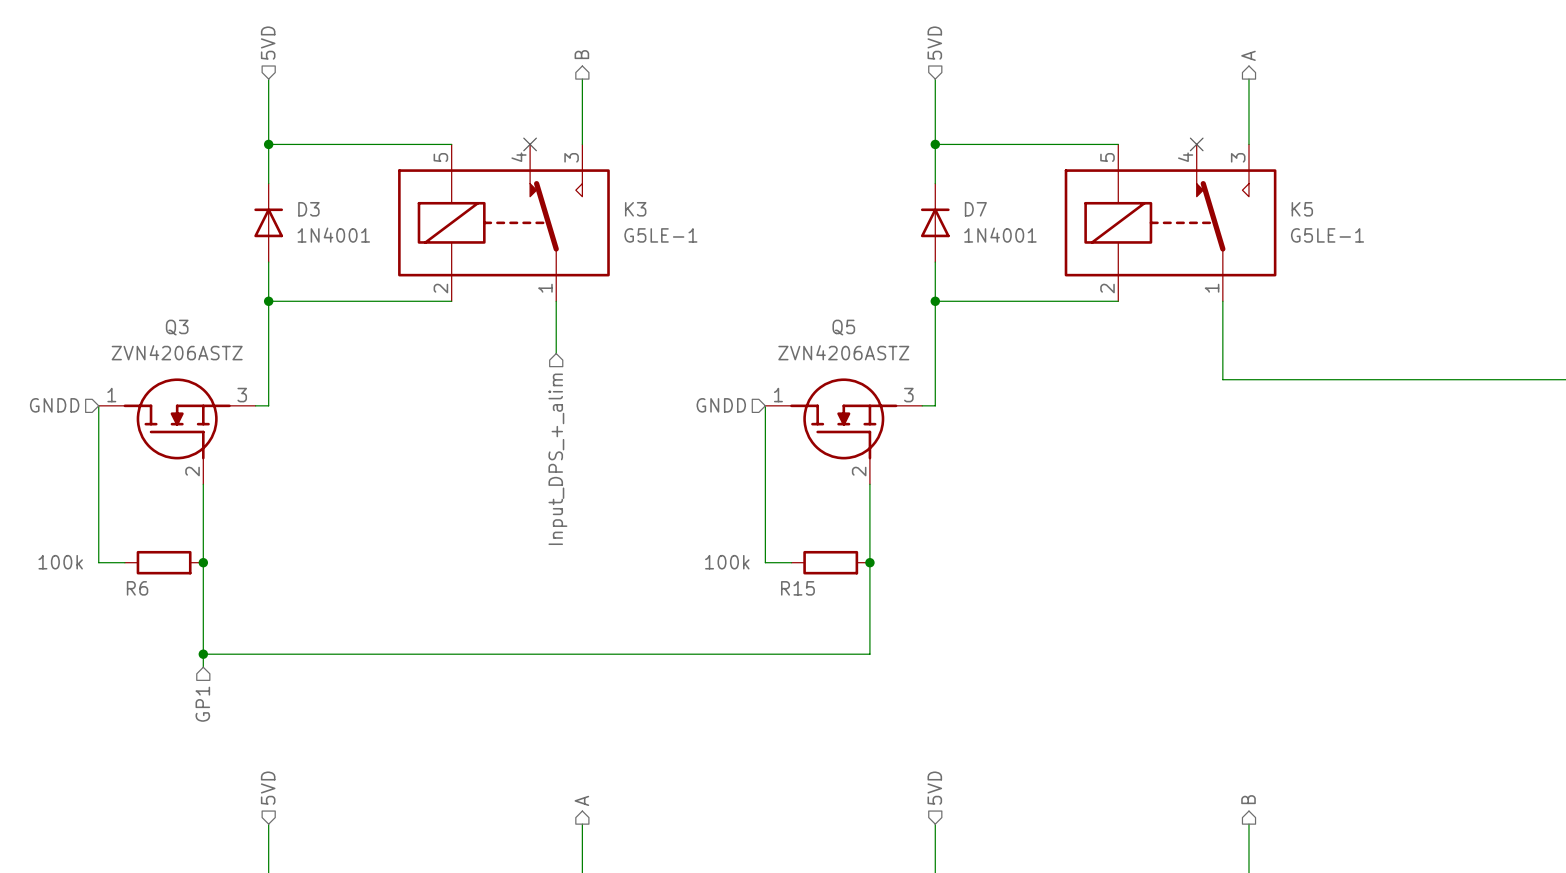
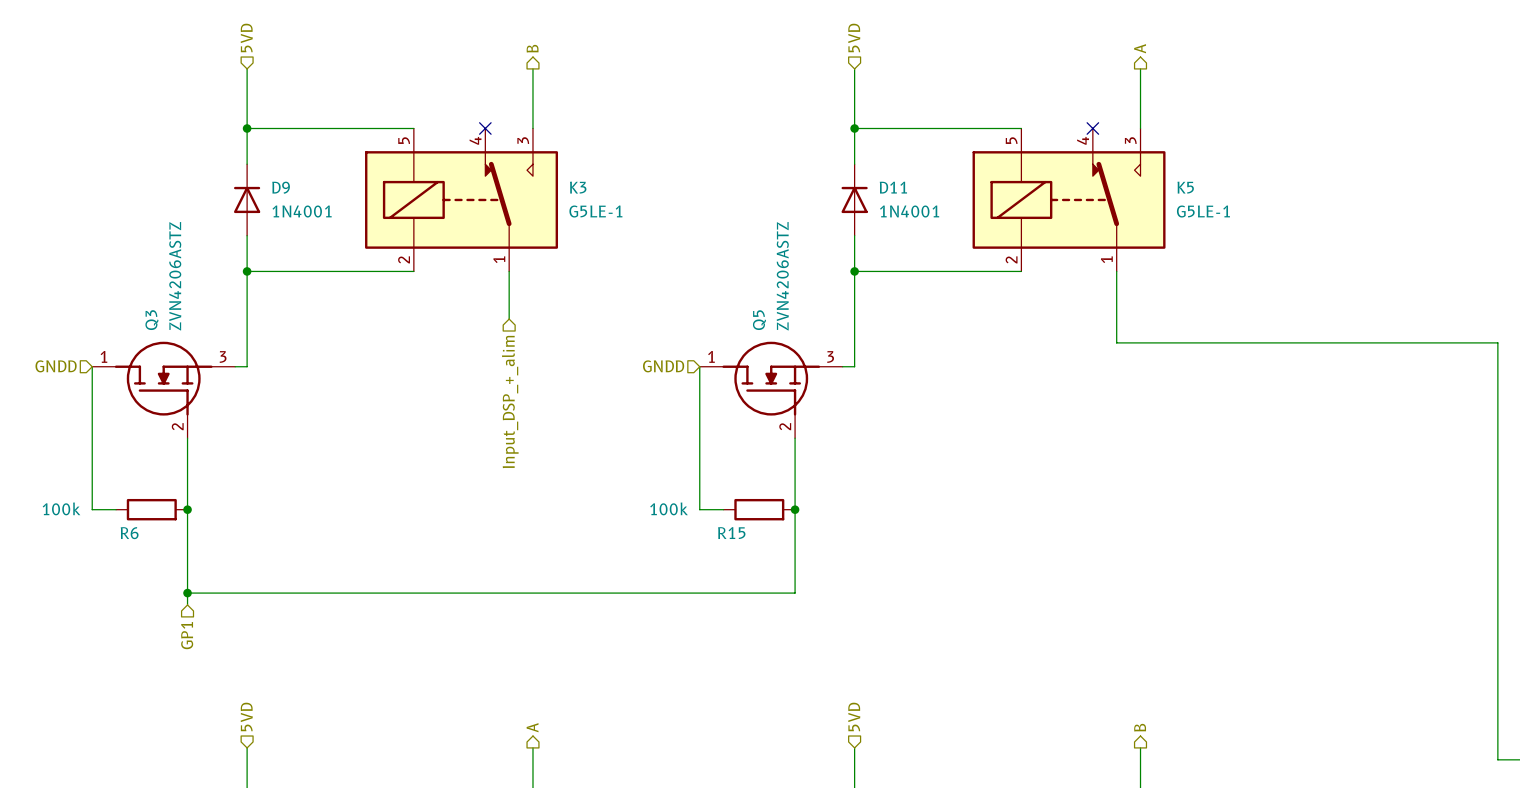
D3 name: D3 (308, 209) -> D9 (281, 187)
D7 name: D7 (975, 209) -> D11 (893, 187)
Q3 name rotation: 0° (177, 327) -> 90° counterclockwise (151, 320)
Q5 name rotation: 0° (843, 327) -> 90° counterclockwise (759, 320)
Q3 value rotation: 0° (177, 352) -> 90° counterclockwise (175, 276)
Q5 value rotation: 0° (843, 352) -> 90° counterclockwise (782, 276)
hierarchical label: Input_DPS_+_alim (557, 459) -> Input_DSP_+_alim (510, 402)

